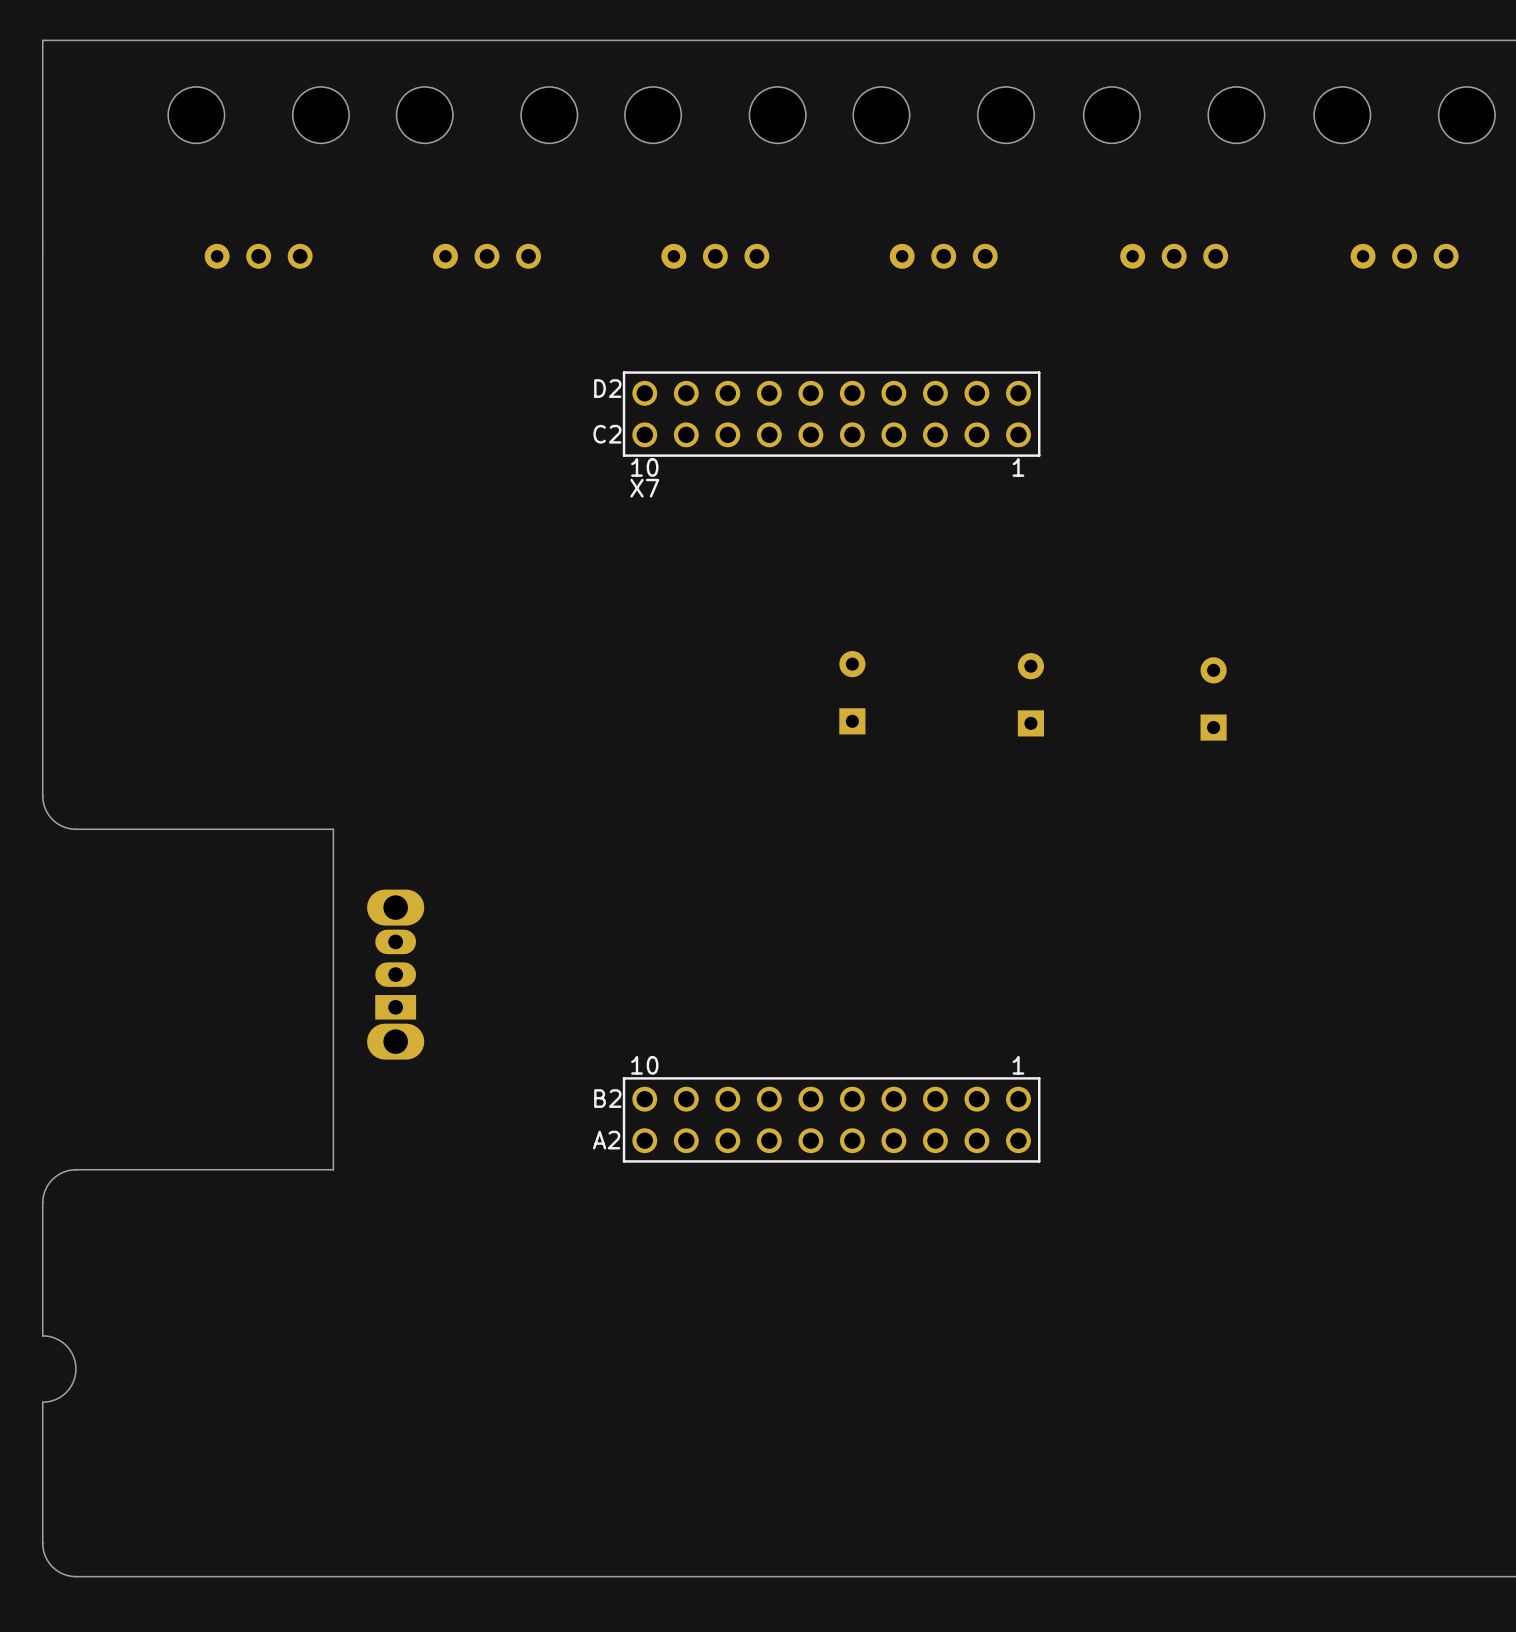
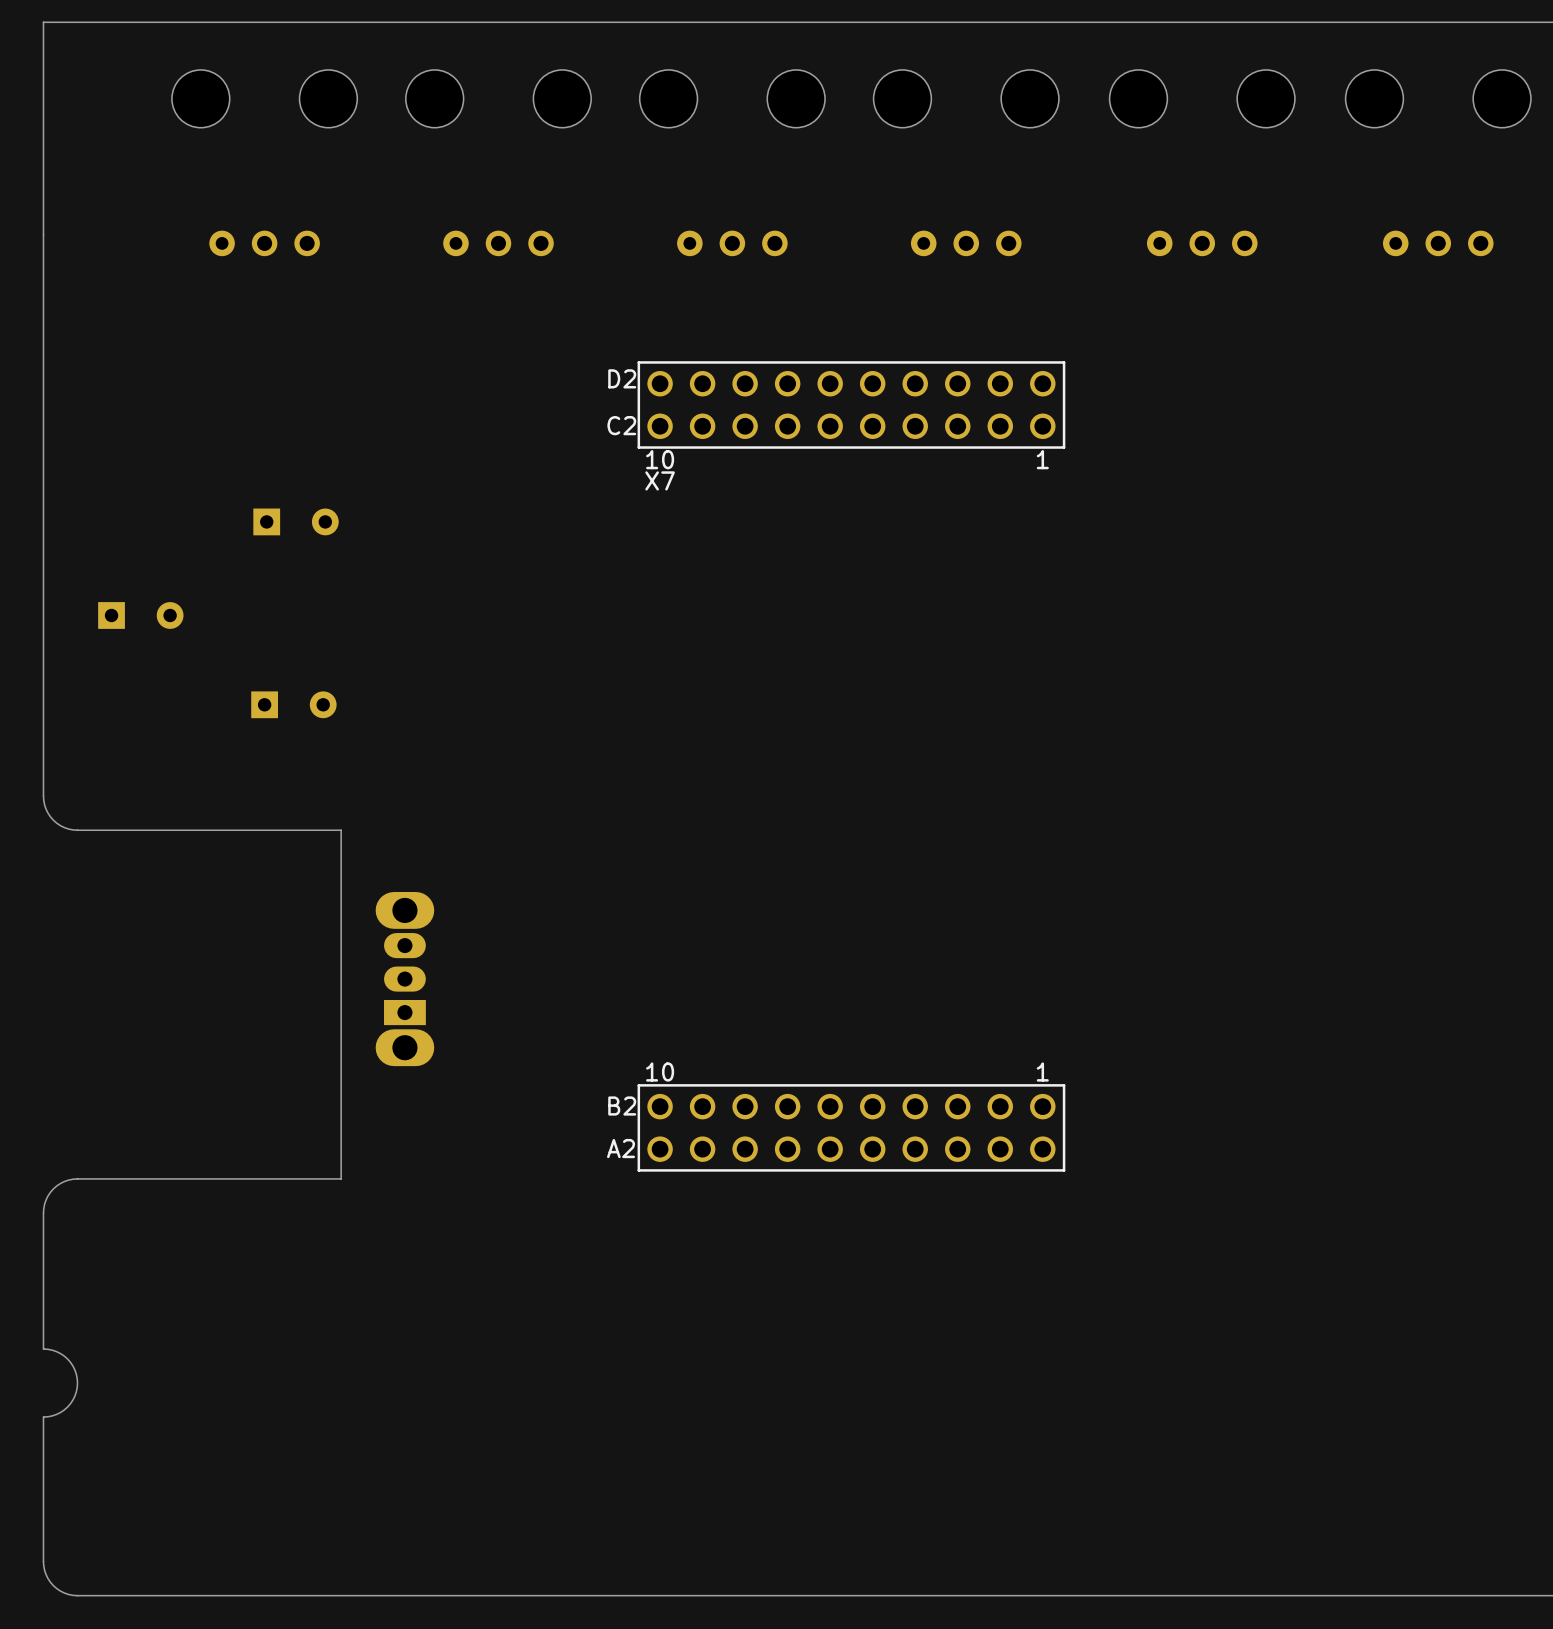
part: none -> (296, 521)
part: none -> (140, 615)
part: (852, 692) -> none
part: (1030, 694) -> none
part: (1213, 698) -> none
part: none -> (293, 704)

